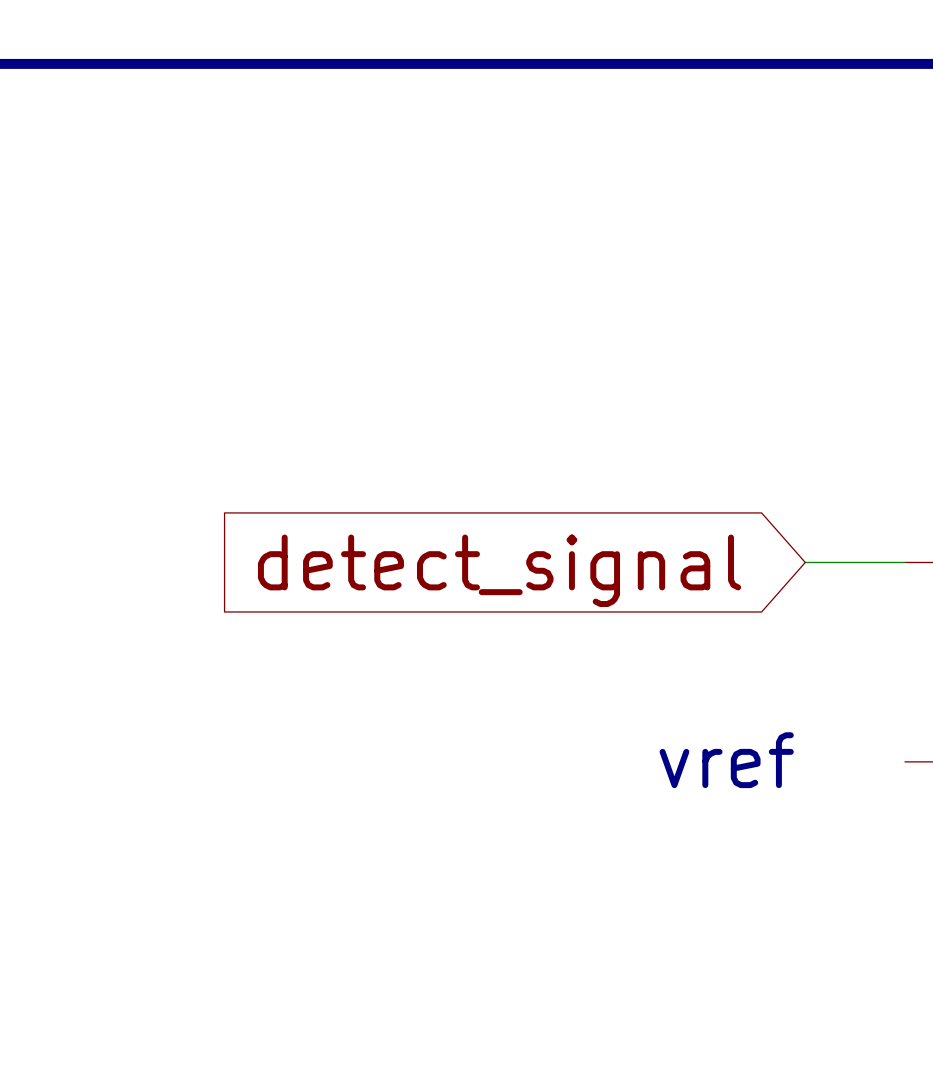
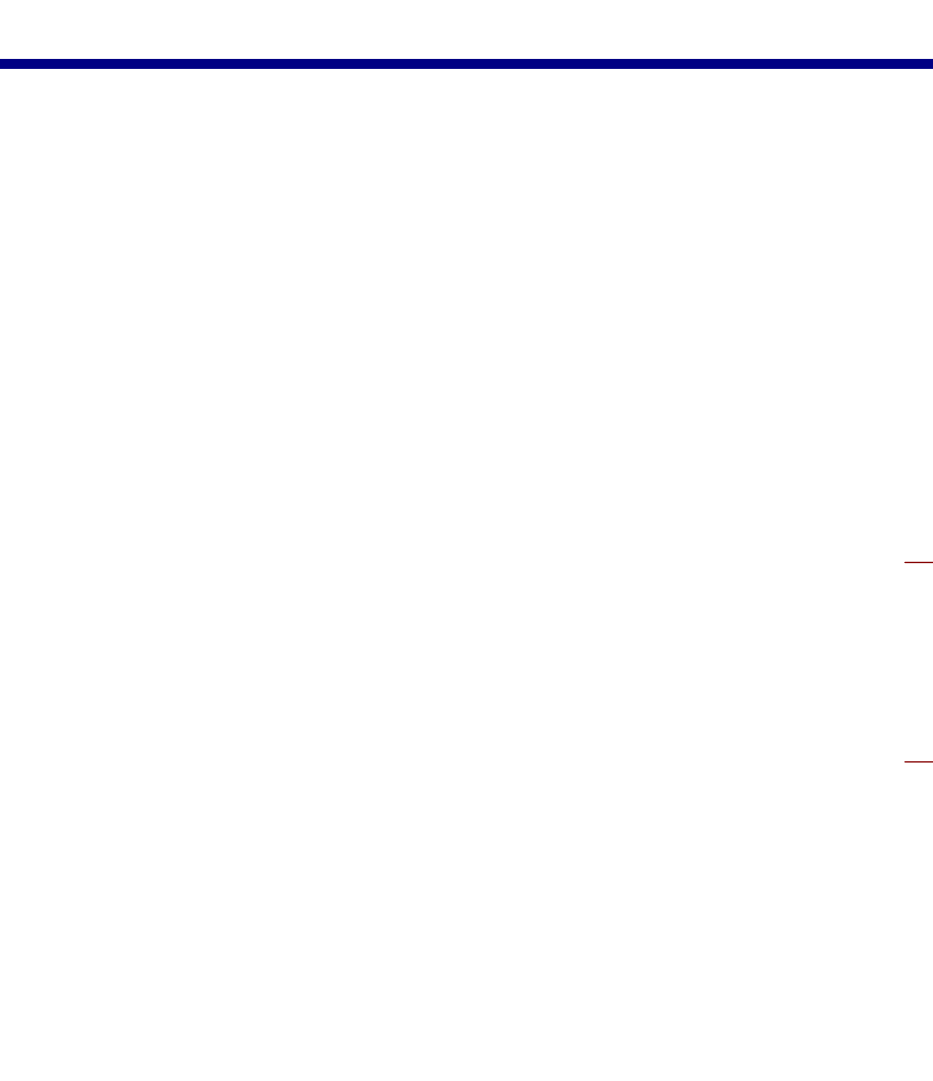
wire: (805, 562) (904, 562) -> none
global label: detect_signal (499, 570) -> none
text: vref (726, 760) -> none

